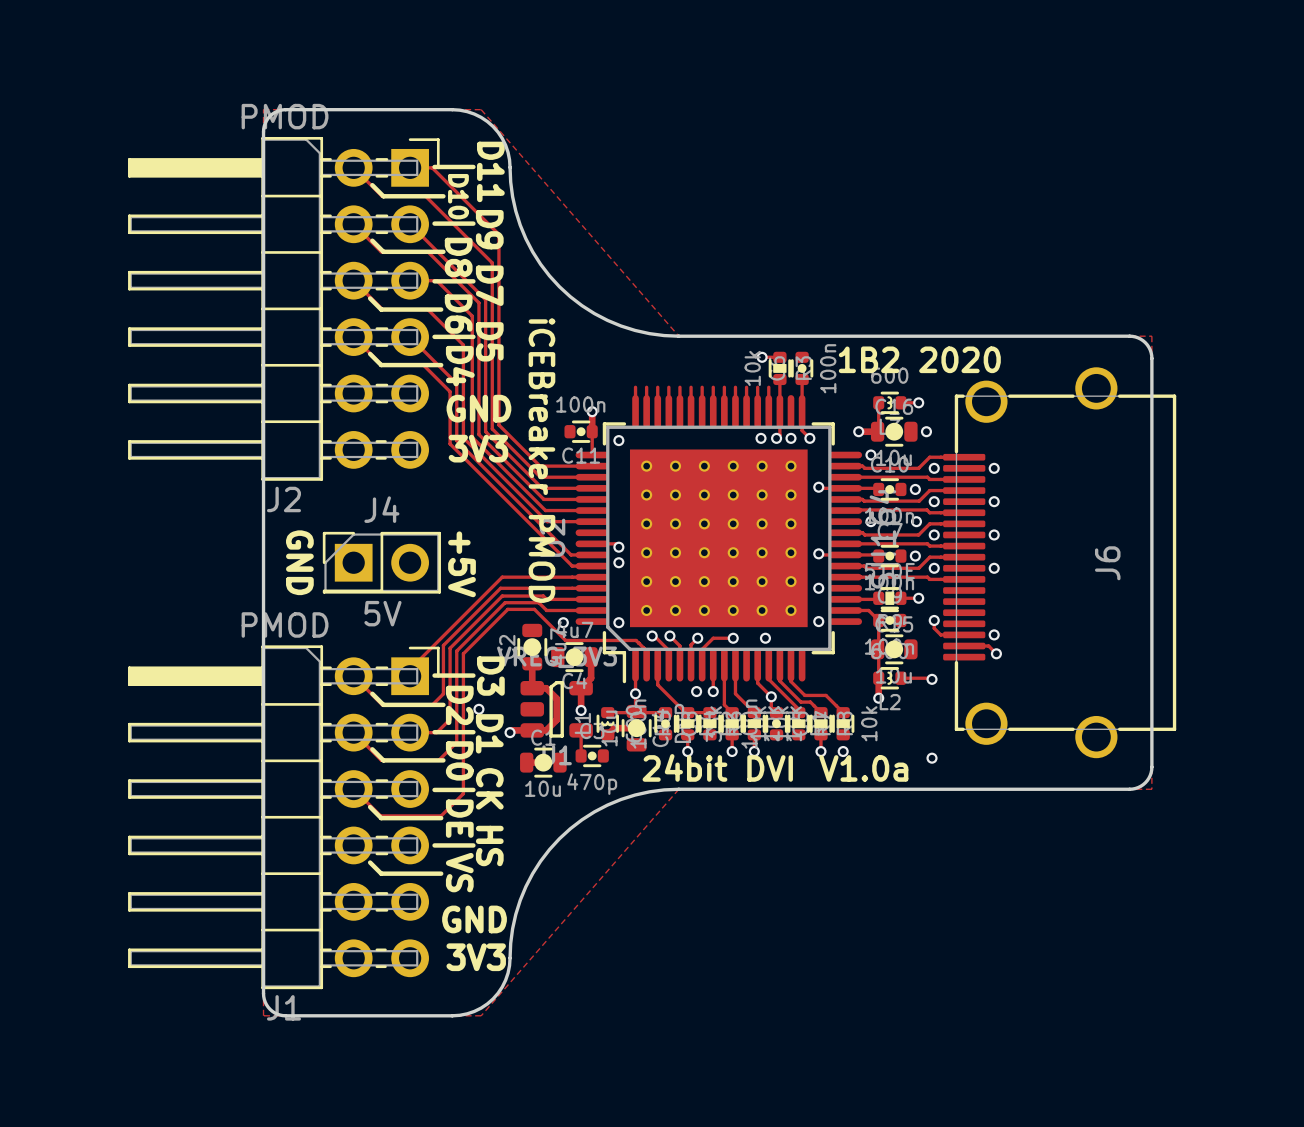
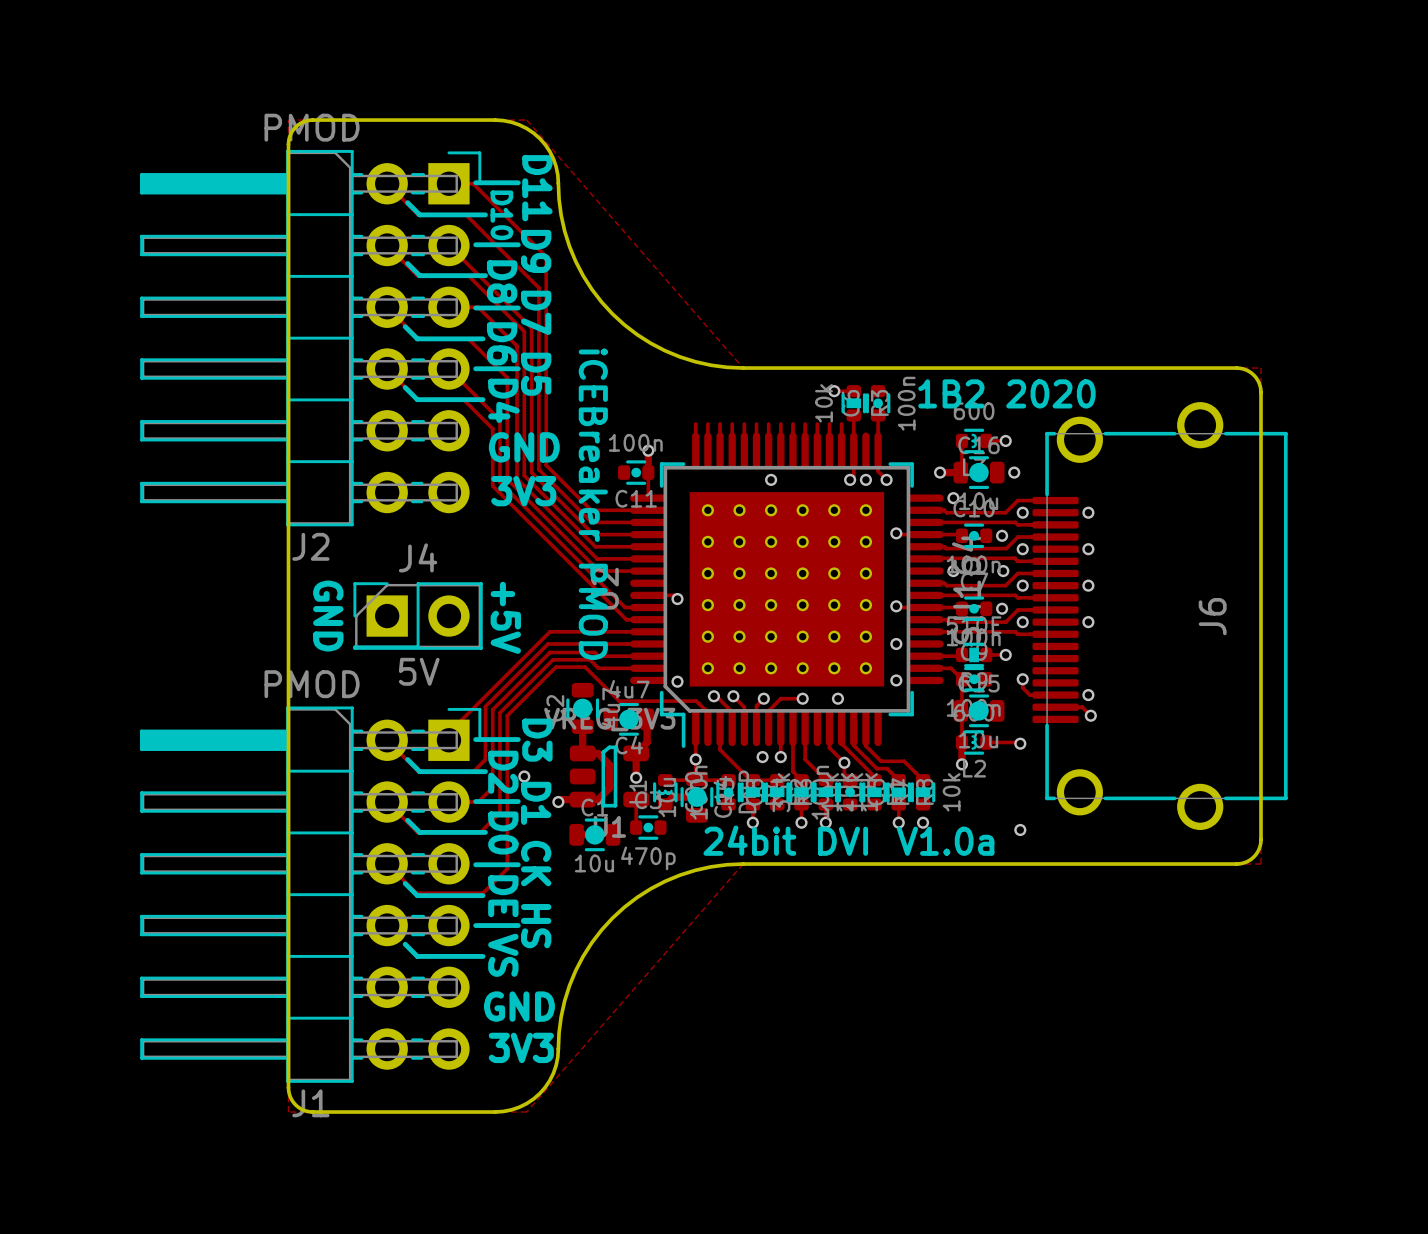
via: none -> (771, 479)
via: (761, 438) -> none
via: (618, 440) -> none
via: (618, 562) -> none
via: (563, 622) -> none

